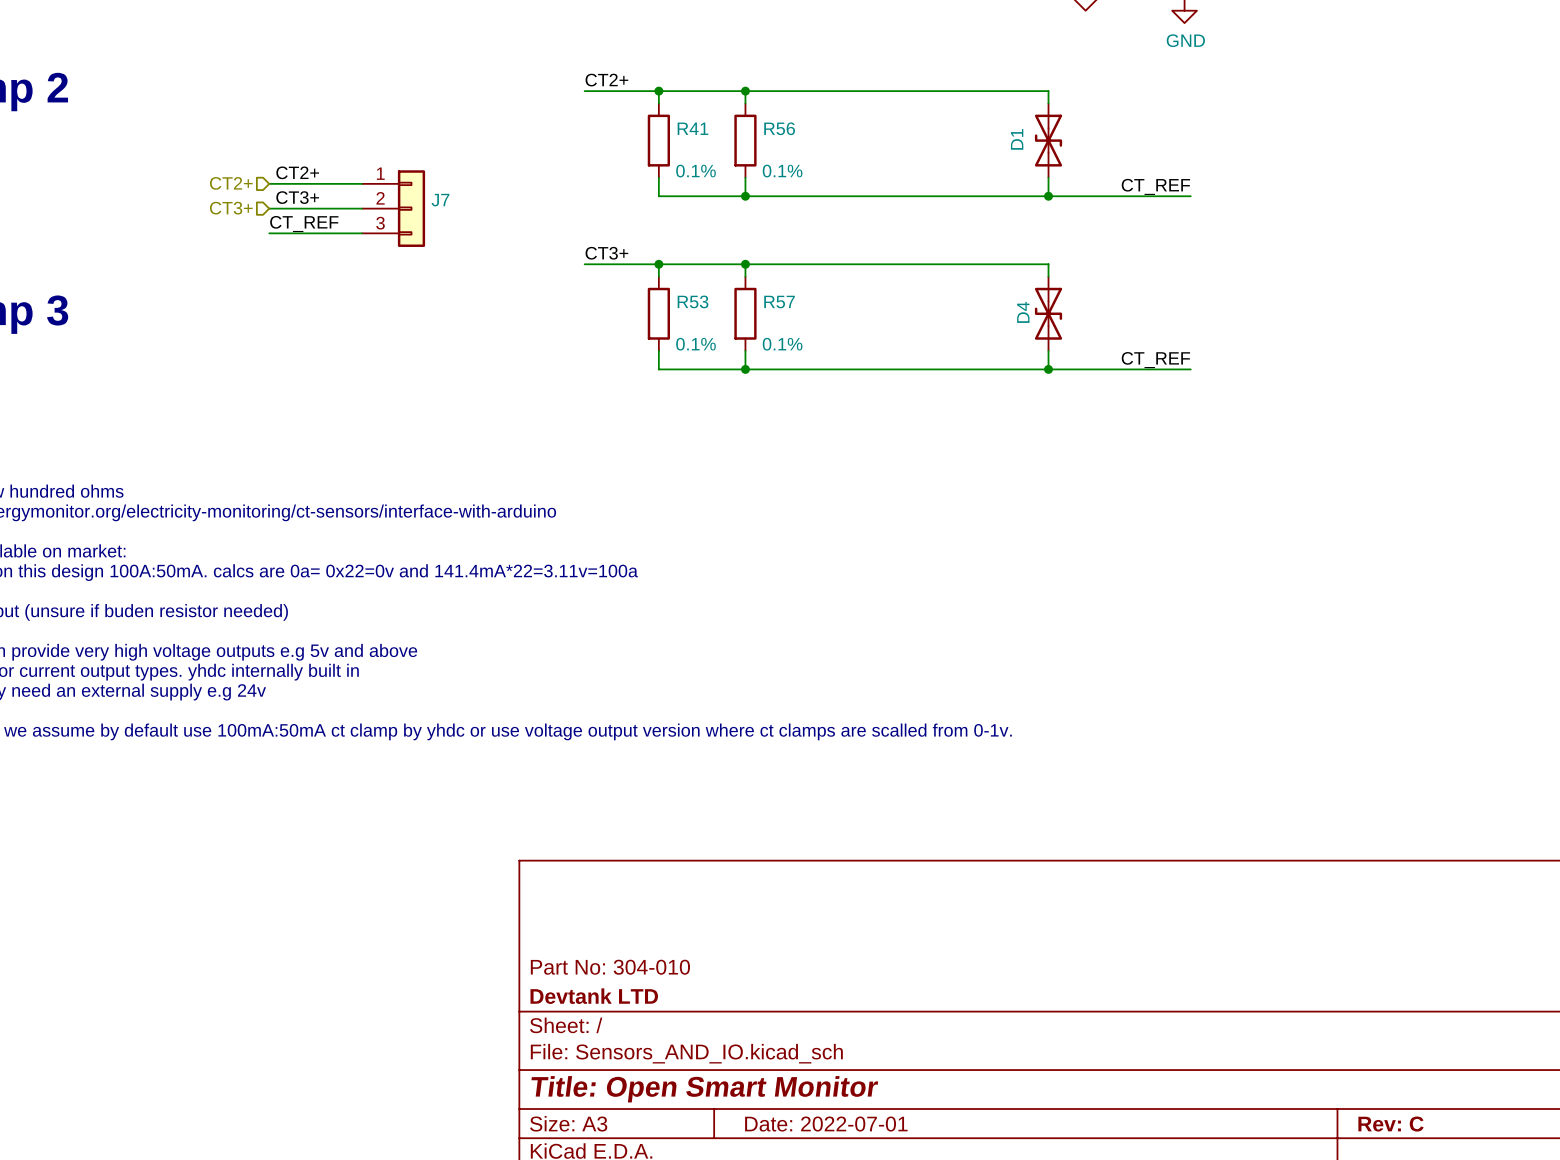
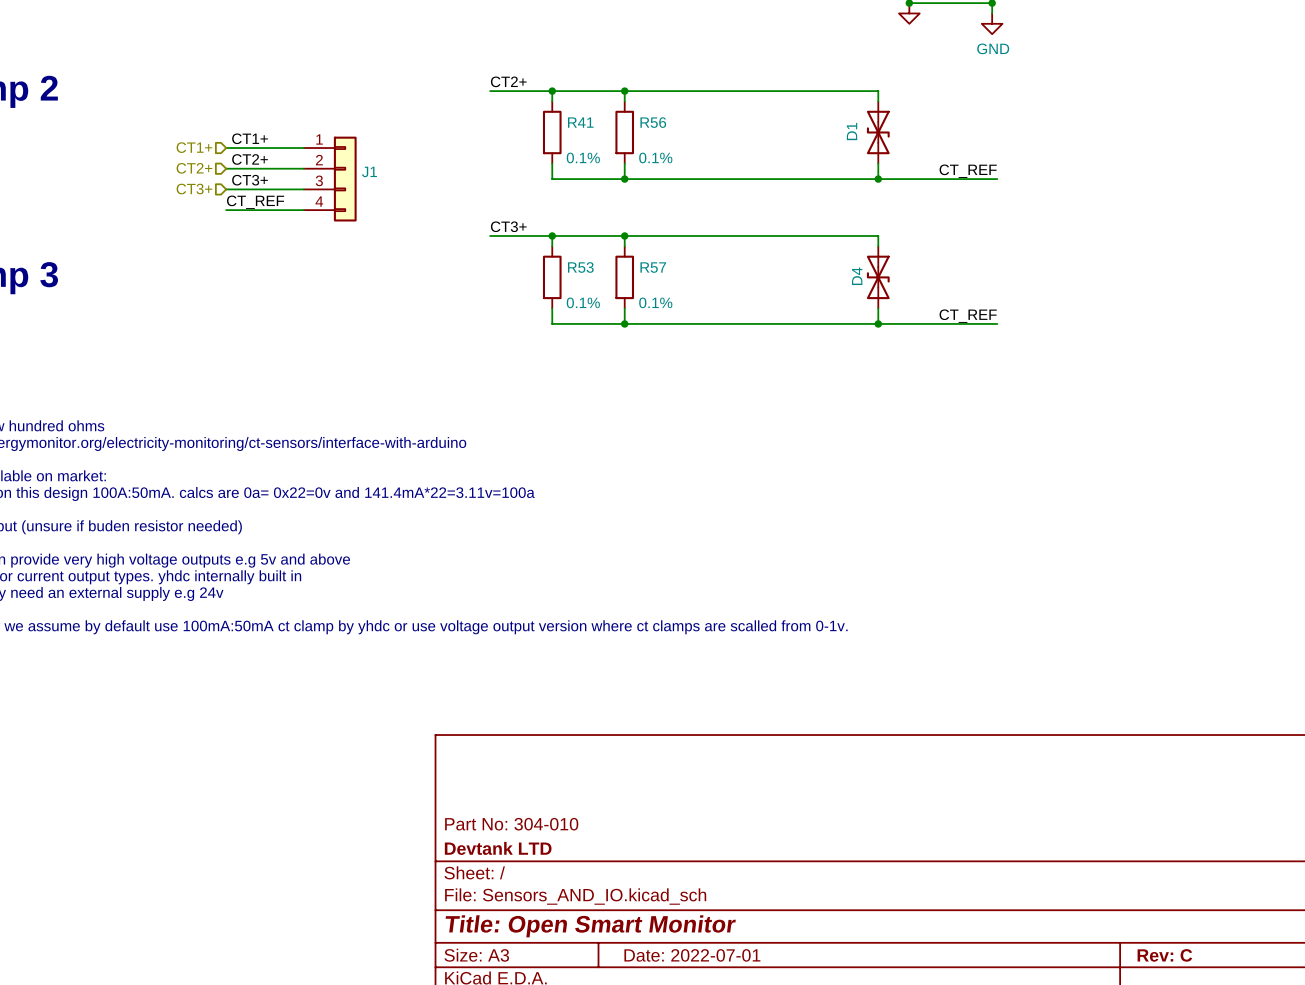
label: none -> CT1+ (250, 138)
hierarchical label: none -> CT1+ (194, 147)
wire: none -> (226, 148) (303, 148)
J1: none -> (330, 179)
J7: (393, 208) -> none

